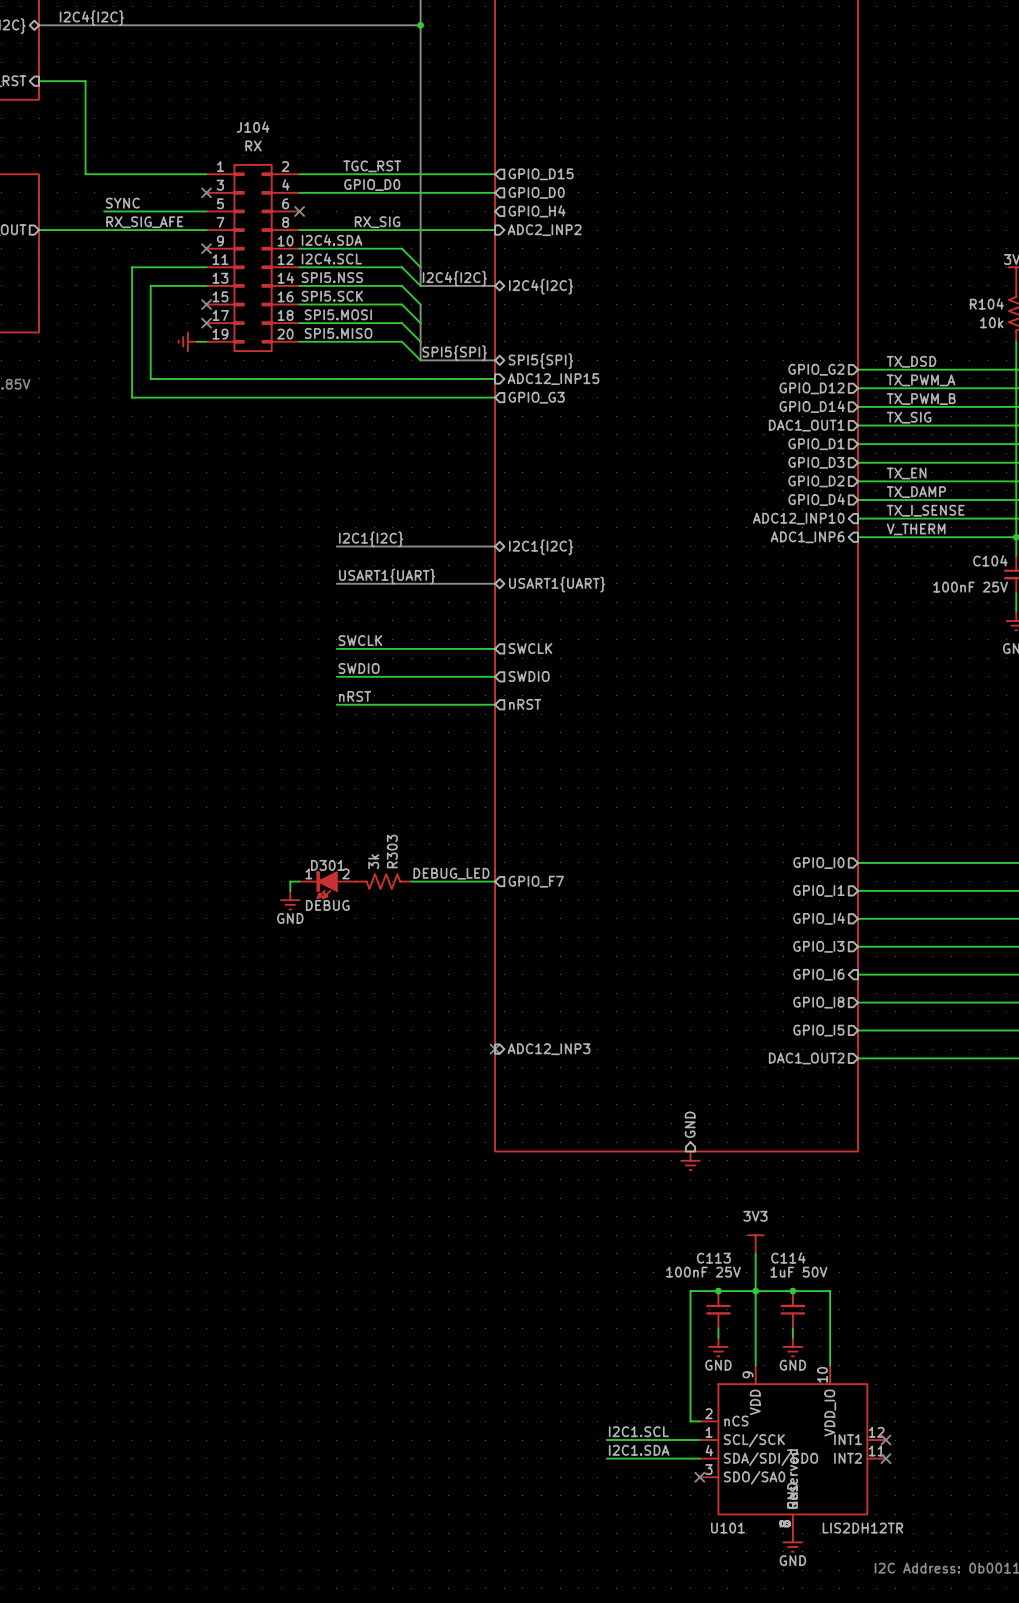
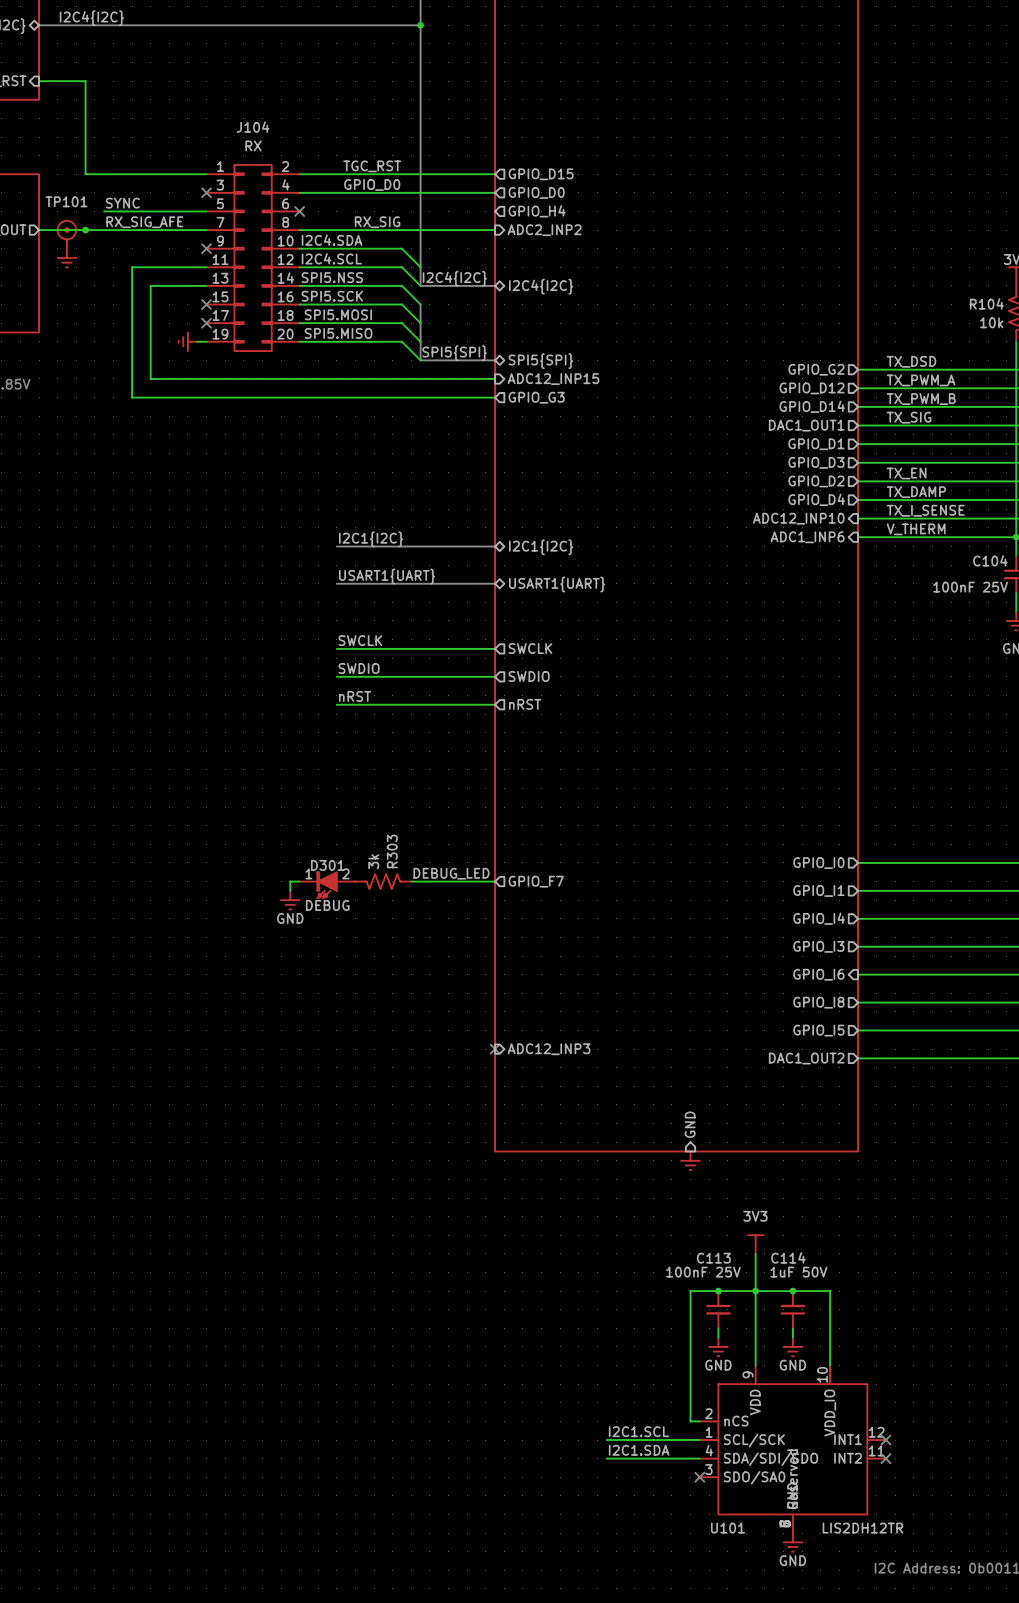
junction: none -> (85, 230)
TP101: none -> (71, 234)
power symbol: none -> (66, 257)

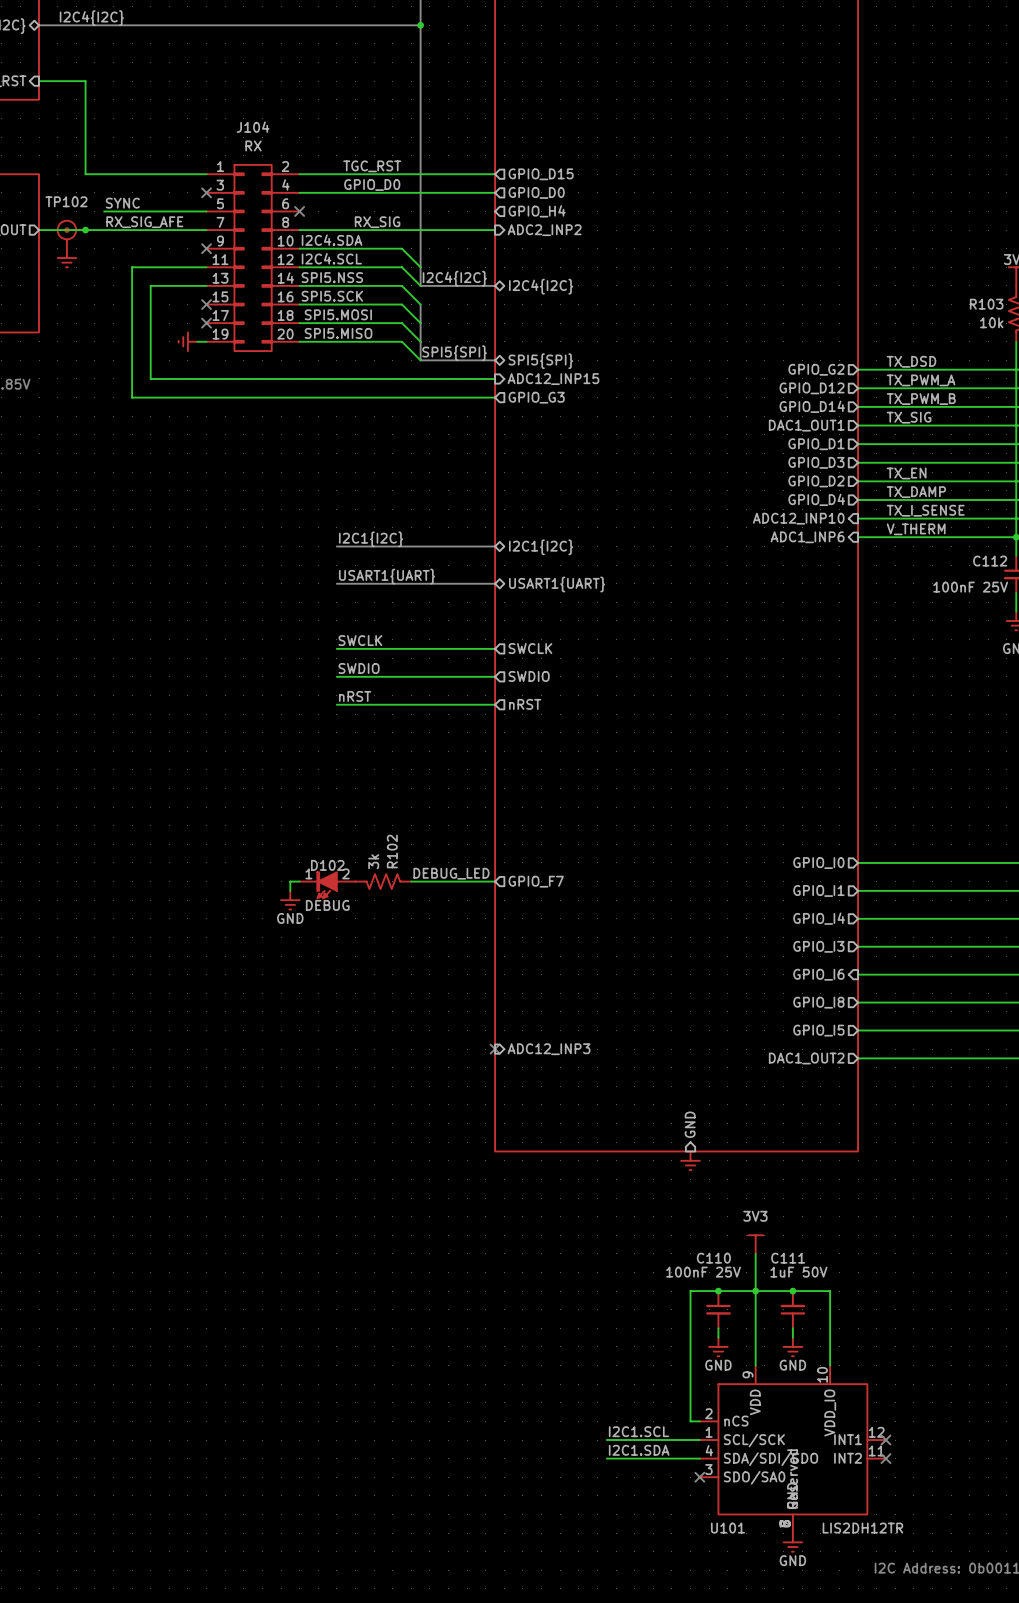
TP101 name: TP101 (66, 201) -> TP102 (66, 201)
R104 name: R104 (986, 303) -> R103 (986, 304)
C104 name: C104 (990, 560) -> C112 (990, 561)
R303 name: R303 (392, 851) -> R102 (392, 851)
D301 name: D301 (327, 865) -> D102 (327, 865)
C114 name: C114 (788, 1257) -> C111 (788, 1258)
C113 name: C113 (713, 1258) -> C110 (713, 1258)

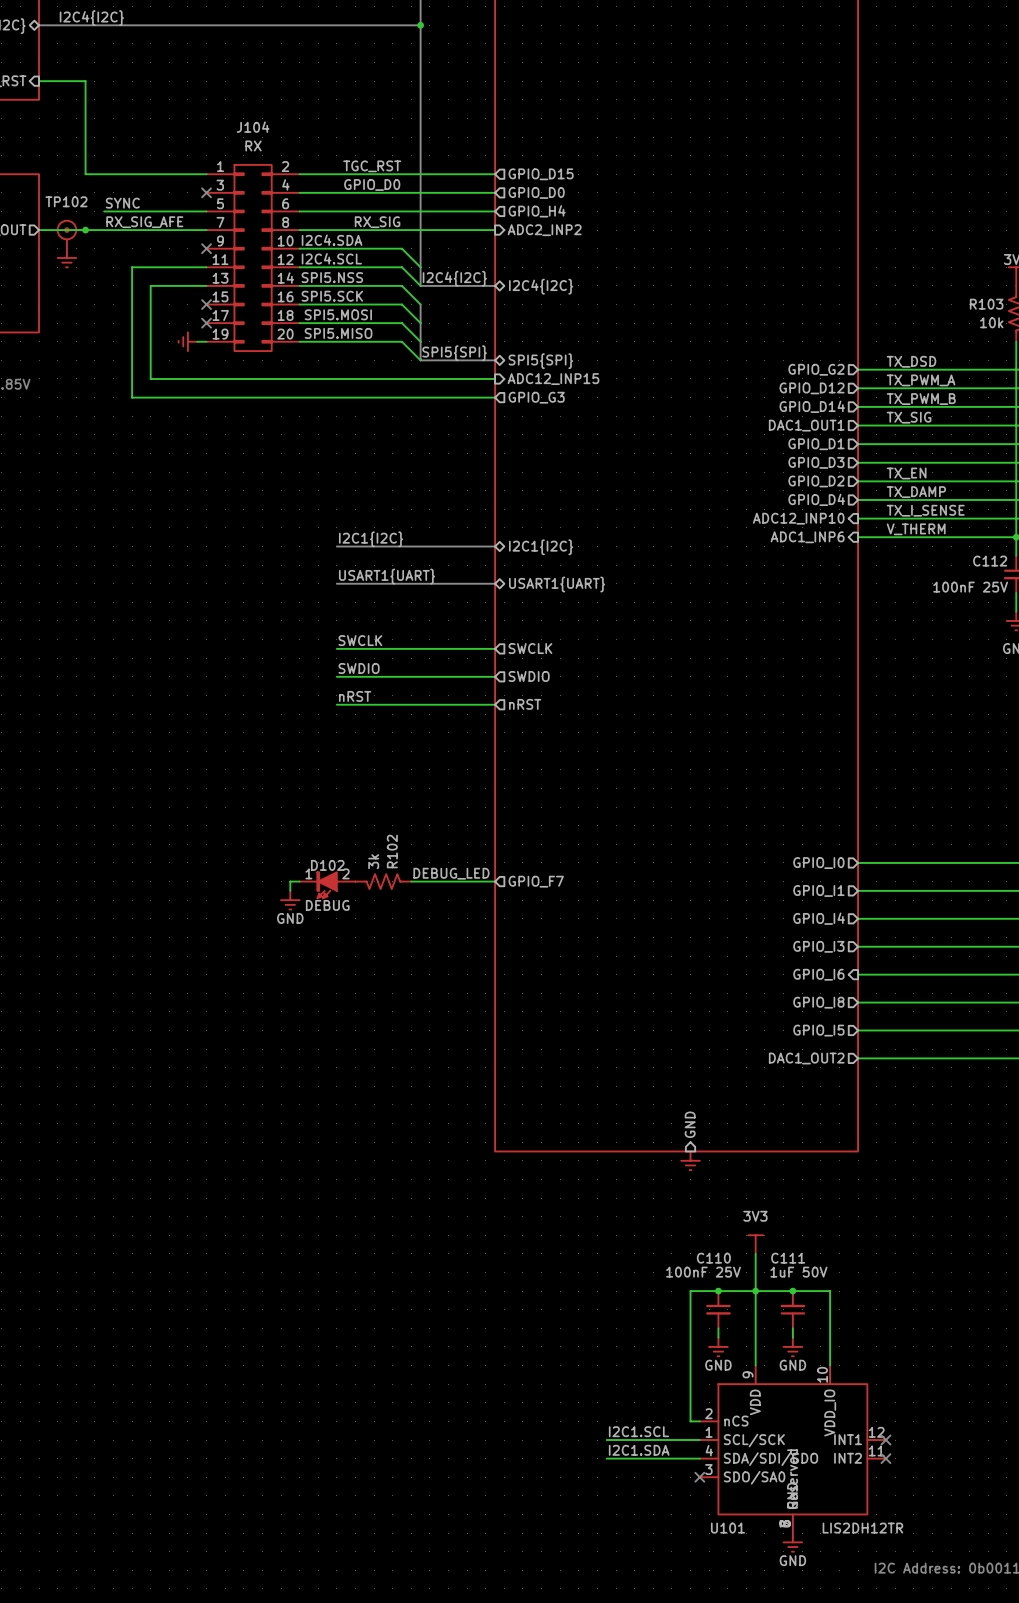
wire: none -> (299, 211) (495, 211)
no-connect mark: (299, 211) -> none
no-connect mark: (495, 1049) -> none
sheet pin: ADC12_INP3 (549, 1049) -> none

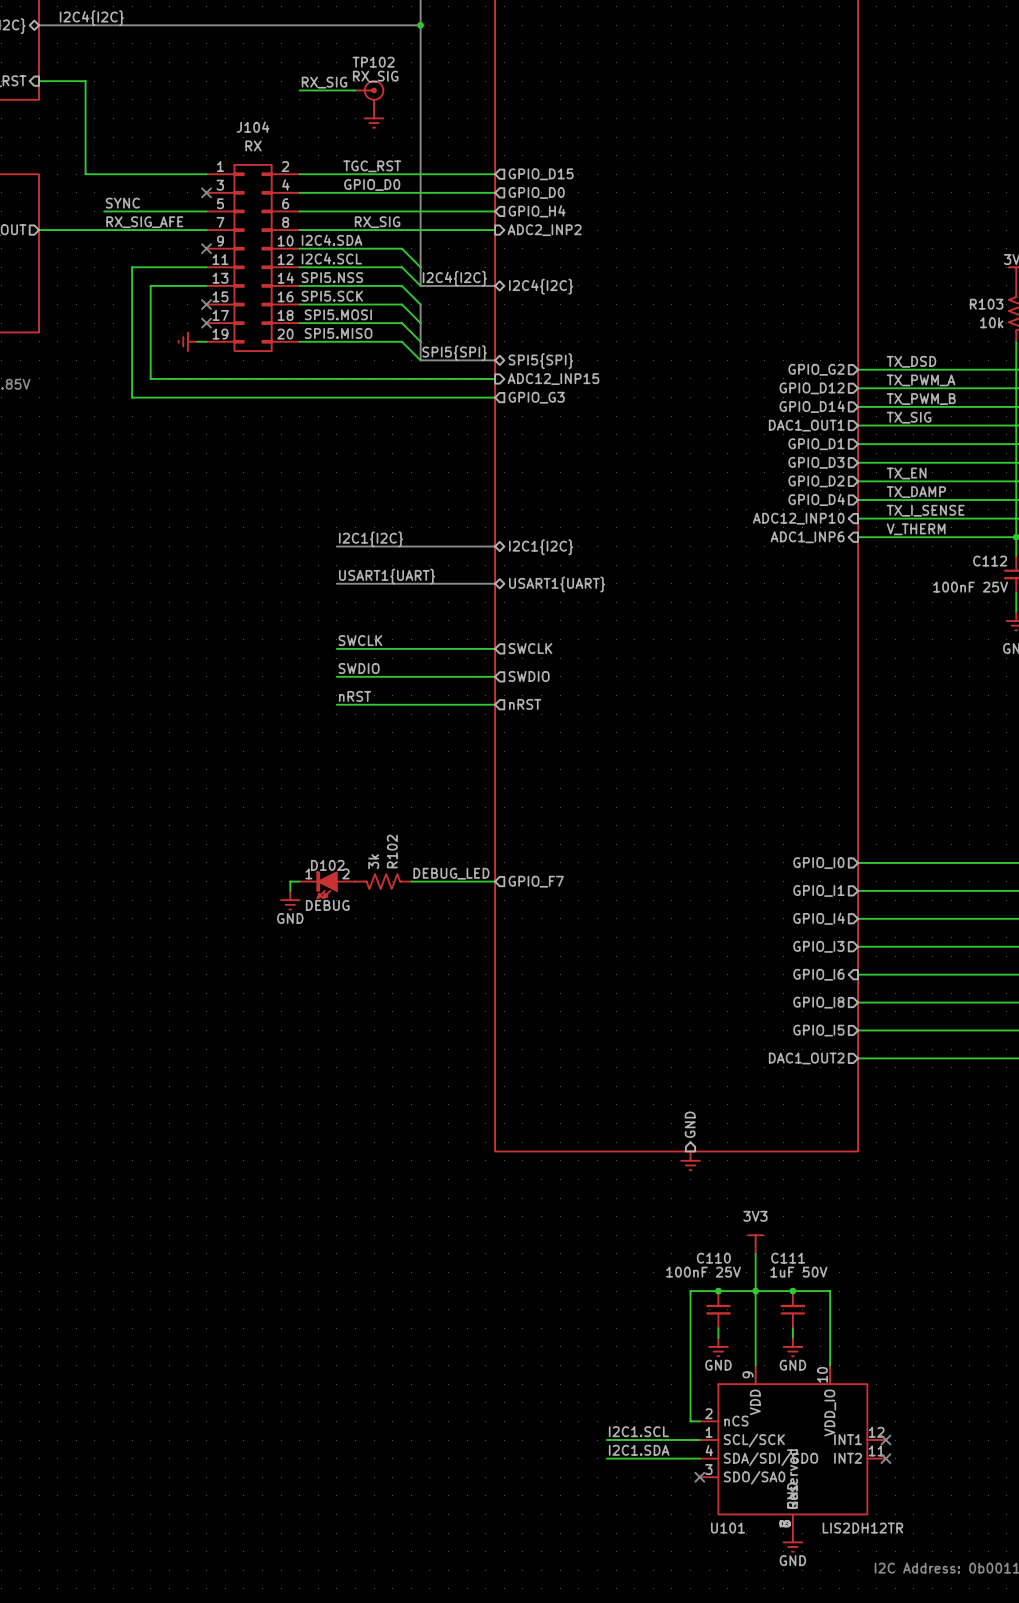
TP102 value: none -> RX_SIG (375, 76)
label: none -> RX_SIG (324, 82)
wire: none -> (299, 90) (355, 90)
power symbol: none -> (374, 118)
TP102 flip: as is (66, 230) -> left-right (374, 90)
junction: (85, 230) -> none
TP102 position: (71, 234) -> (369, 95)
power symbol: (66, 257) -> none

